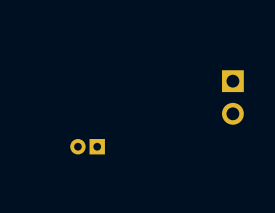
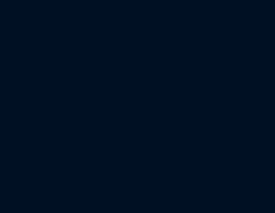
part: (232, 97) -> none
part: (87, 146) -> none

